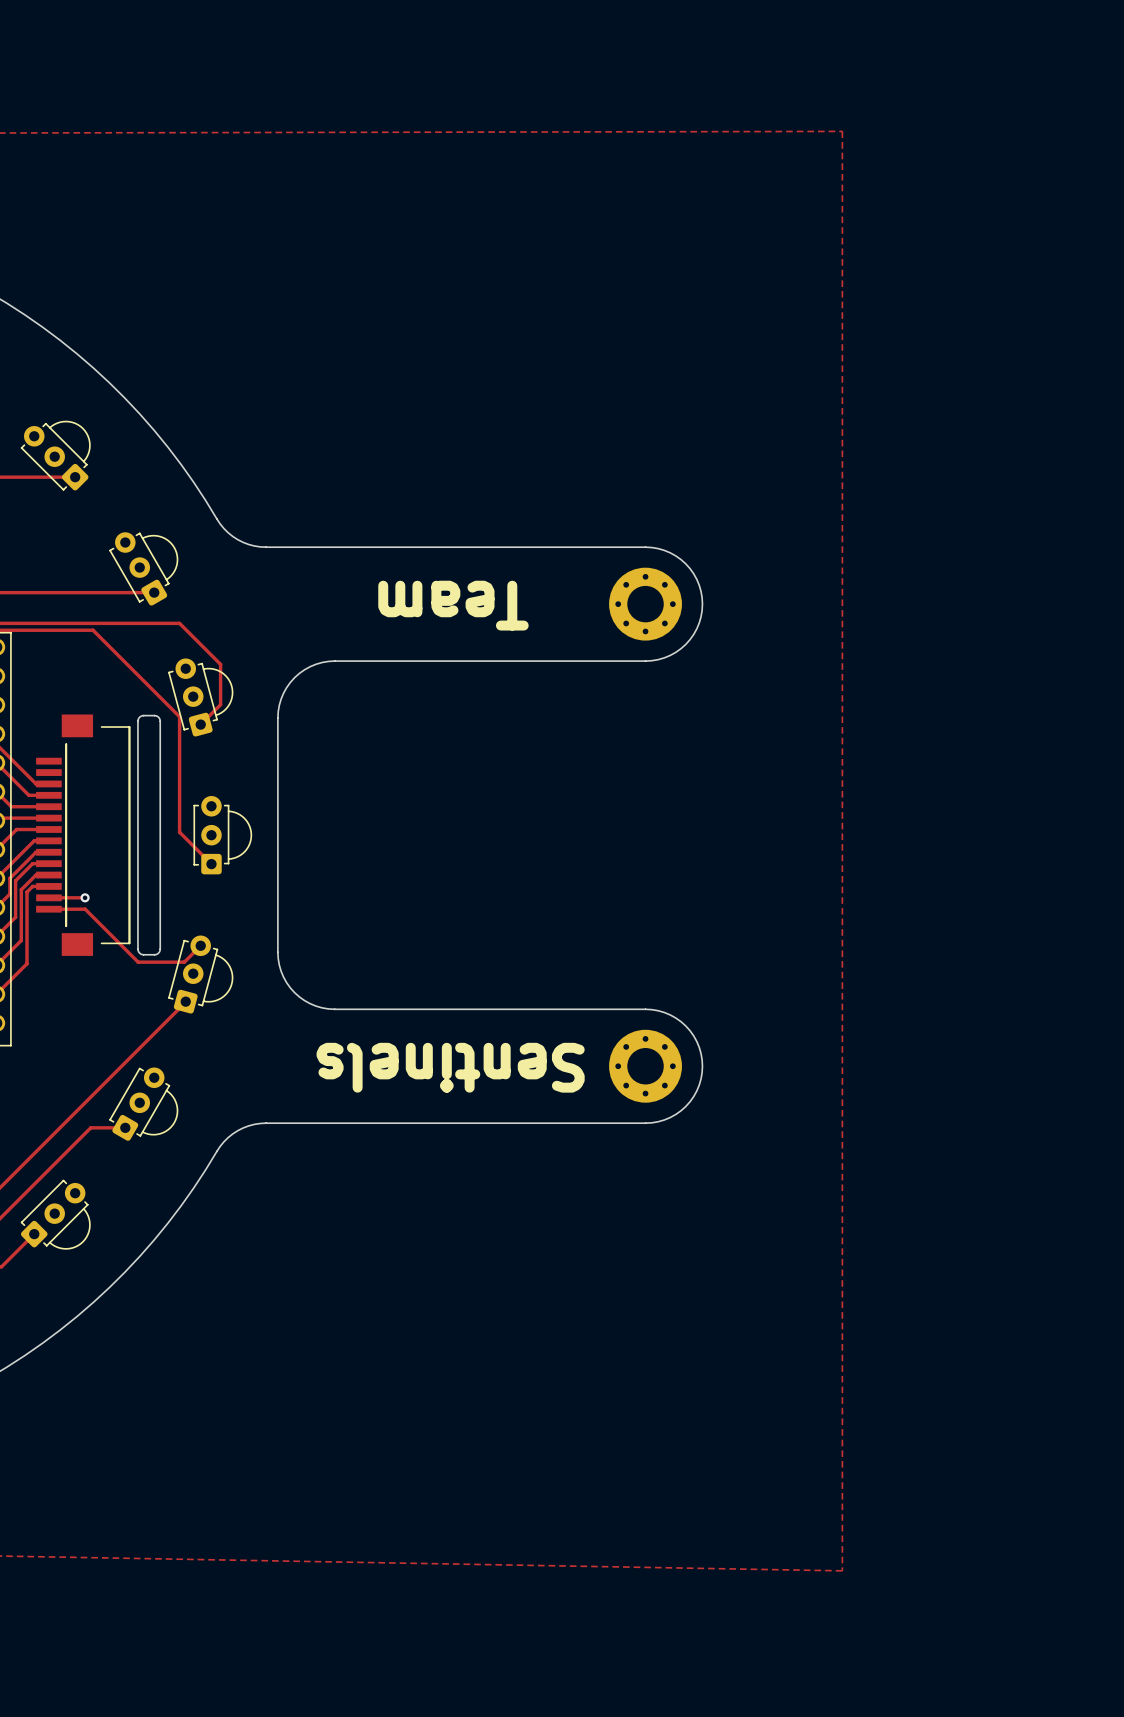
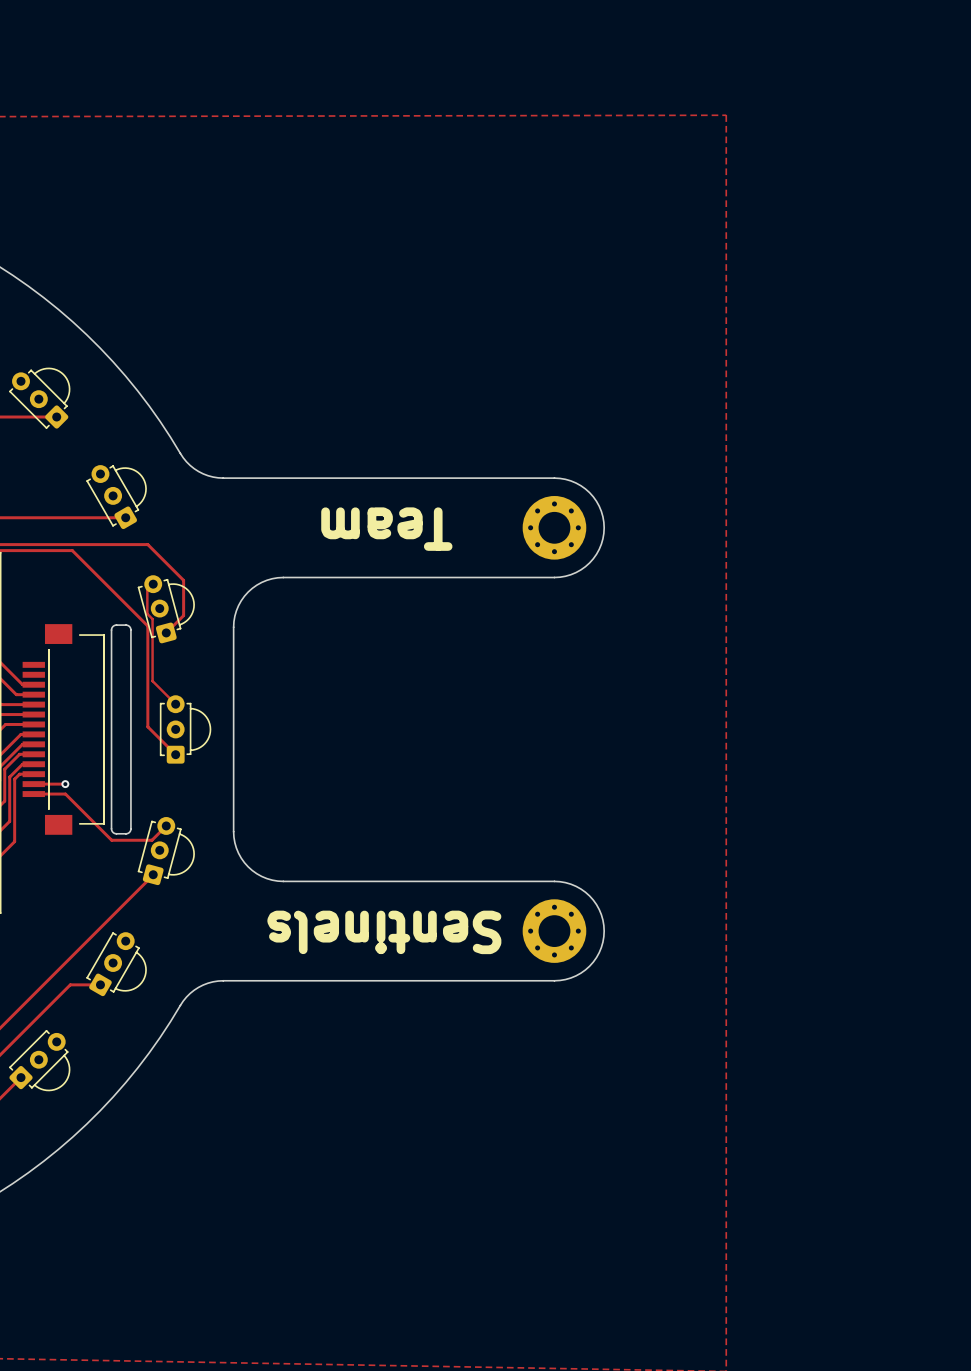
track: none -> (153, 584) (147, 590) (147, 613) (152, 619) (152, 681) (175, 704)

